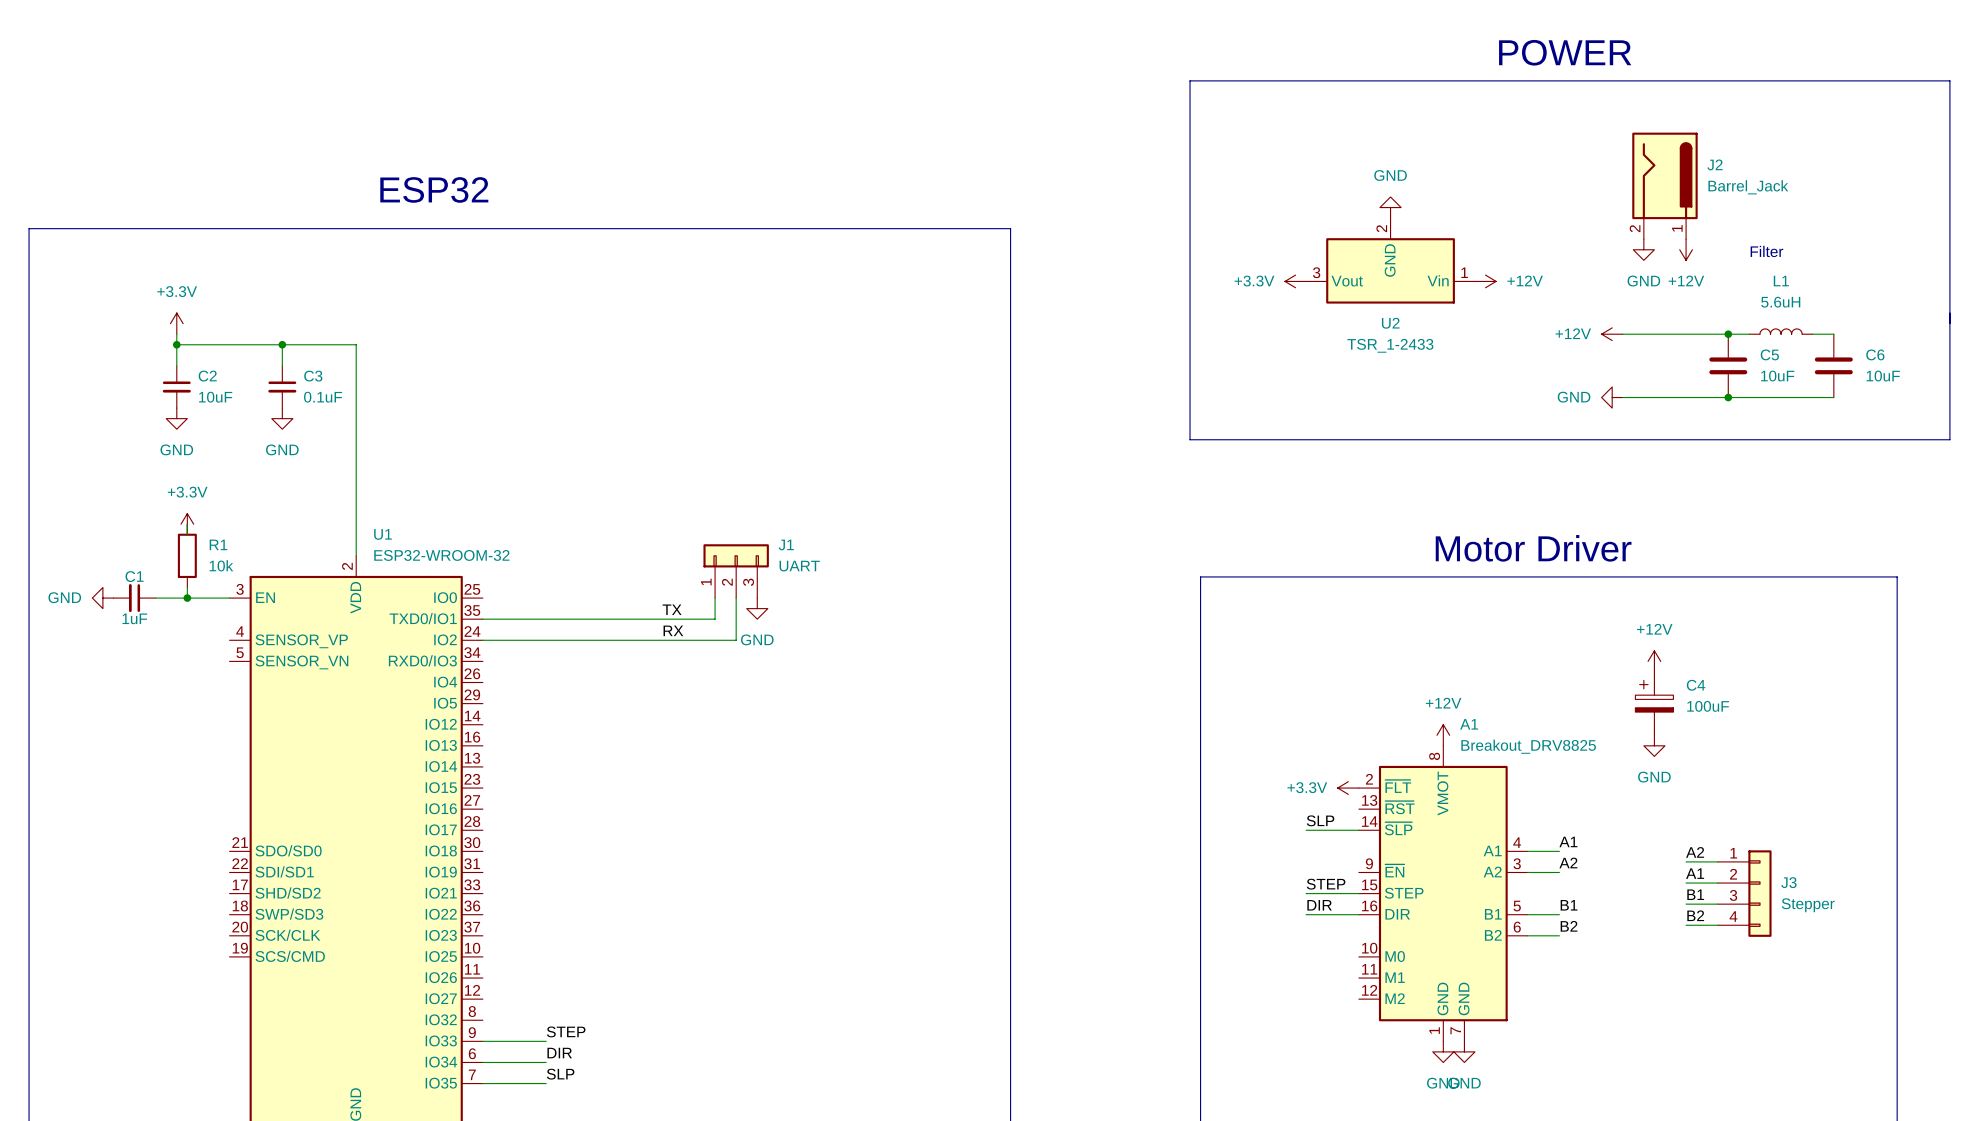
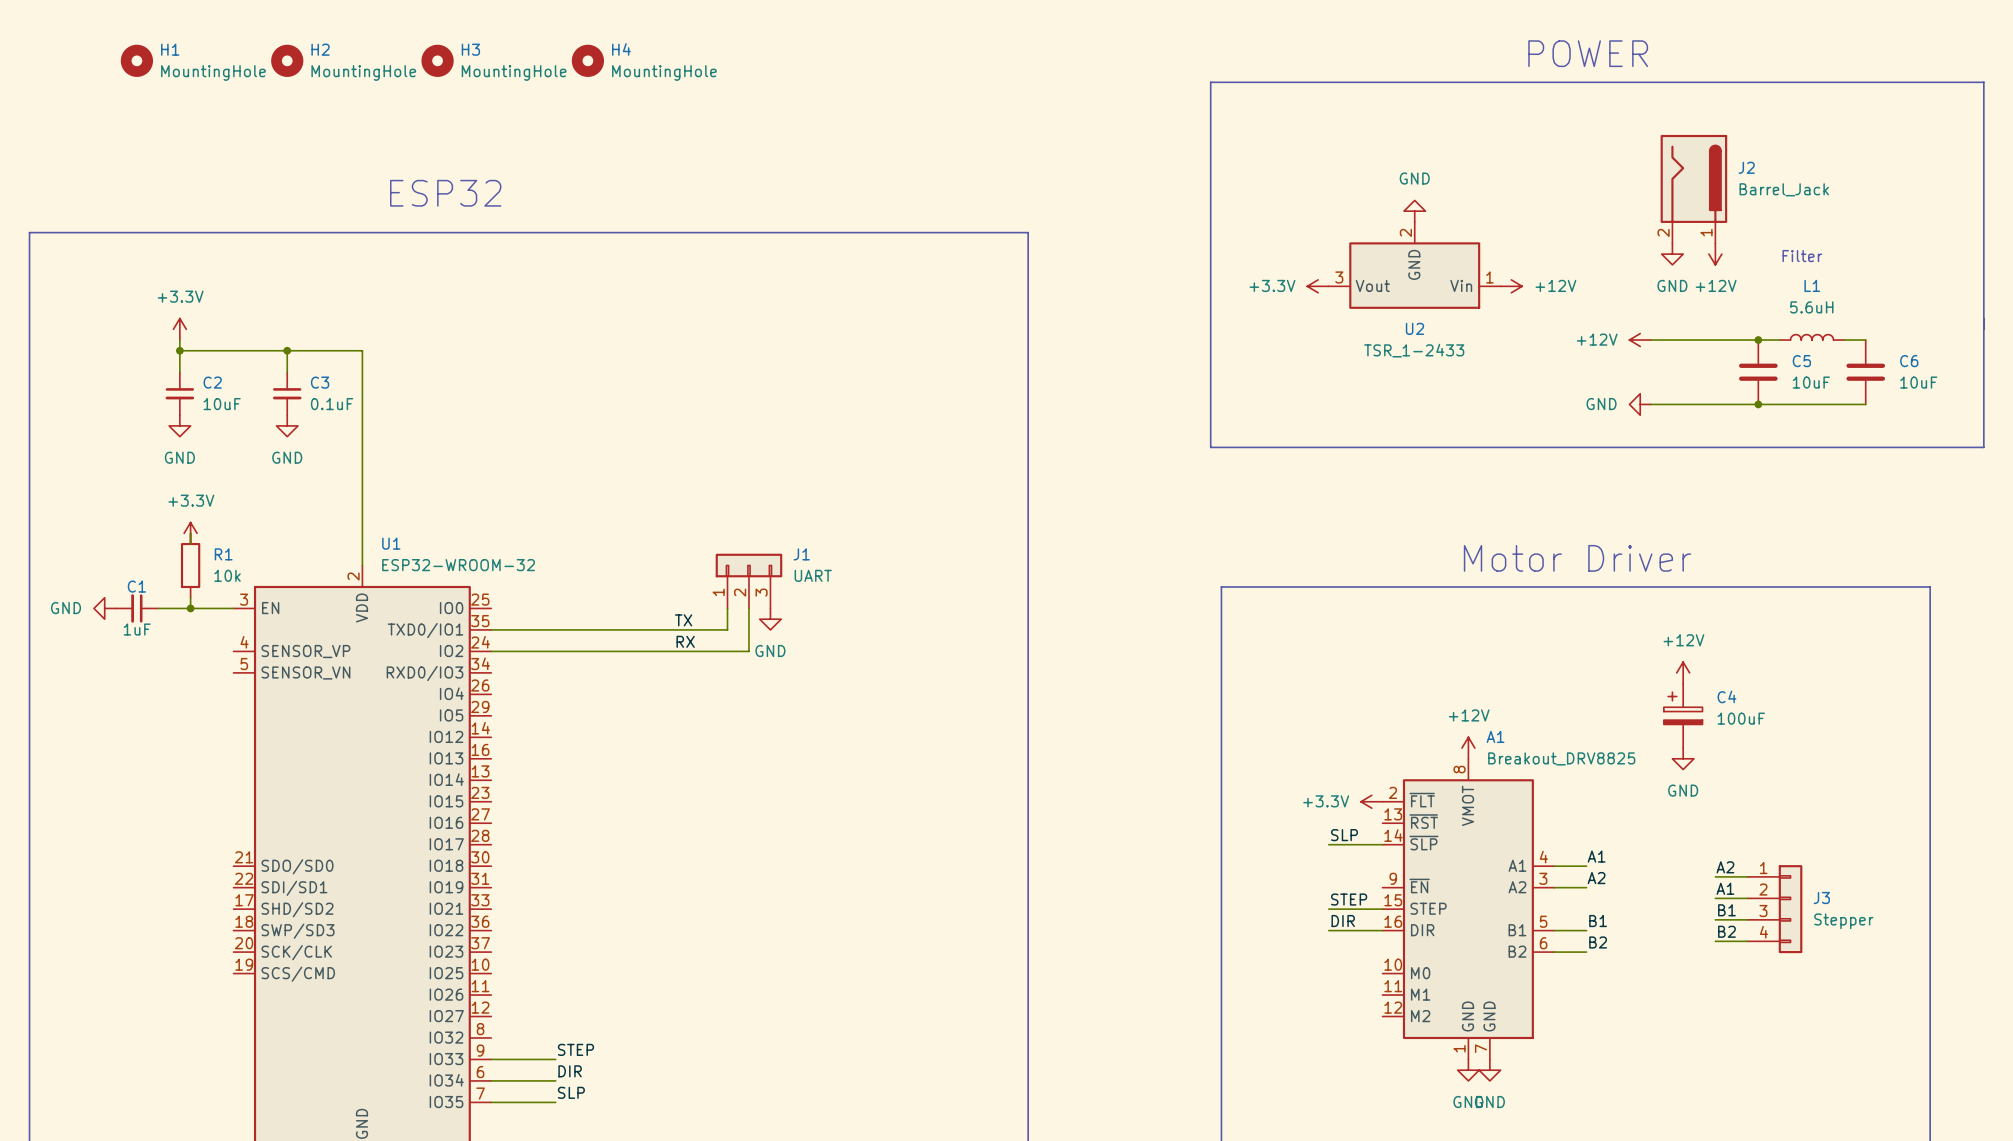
H1: none -> MountingHole (136, 60)
H2: none -> MountingHole (287, 60)
H3: none -> MountingHole (437, 60)
H4: none -> MountingHole (587, 60)

